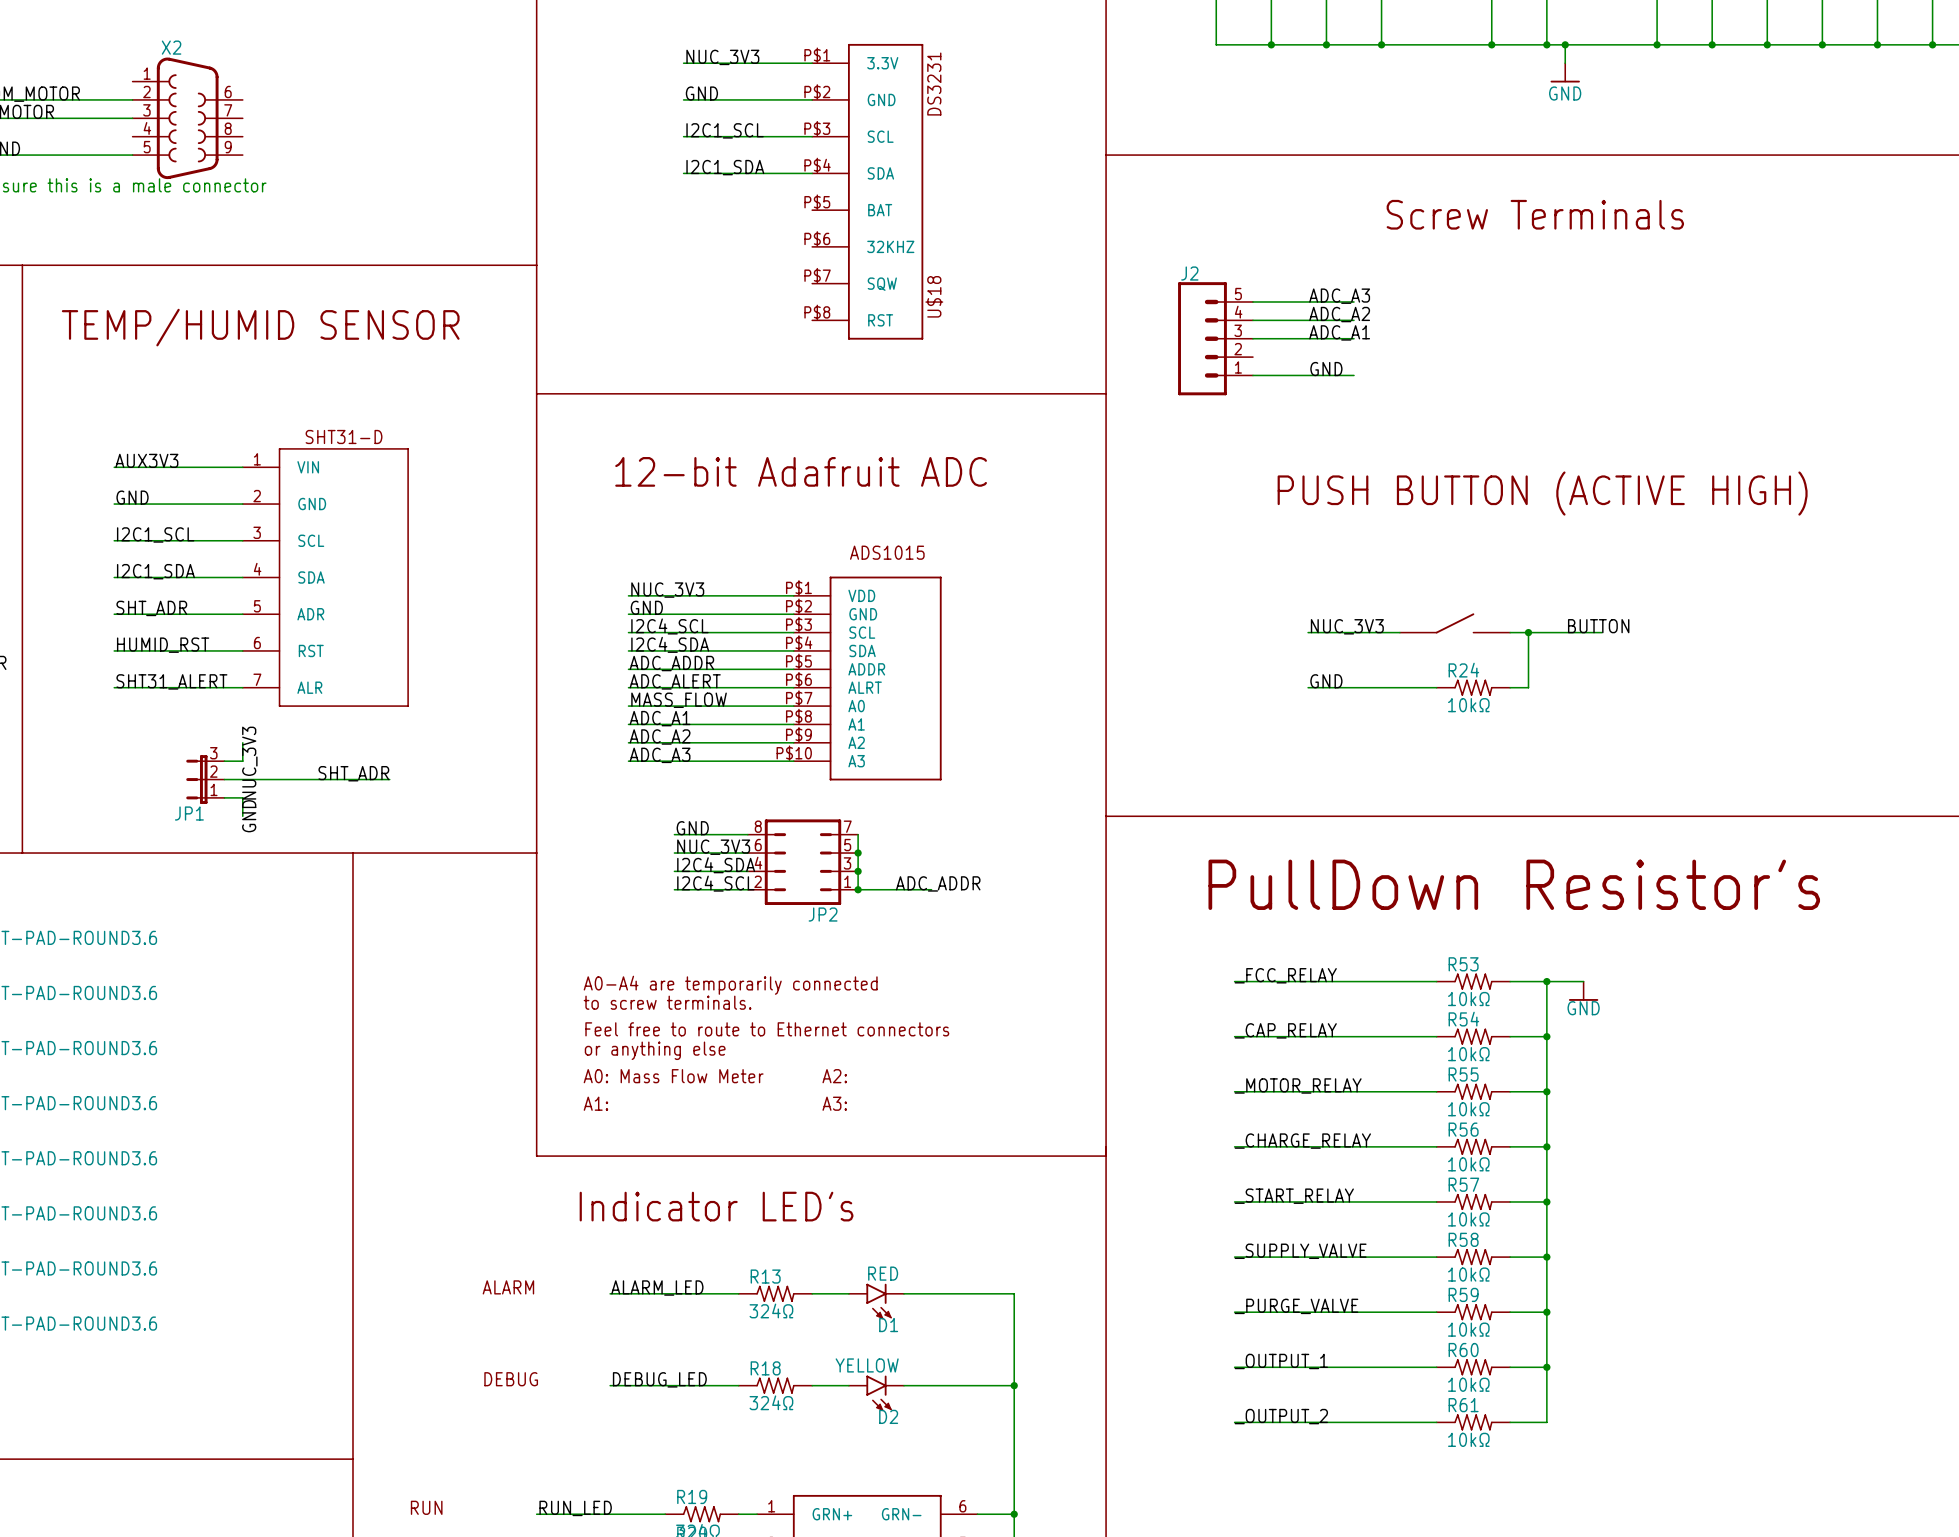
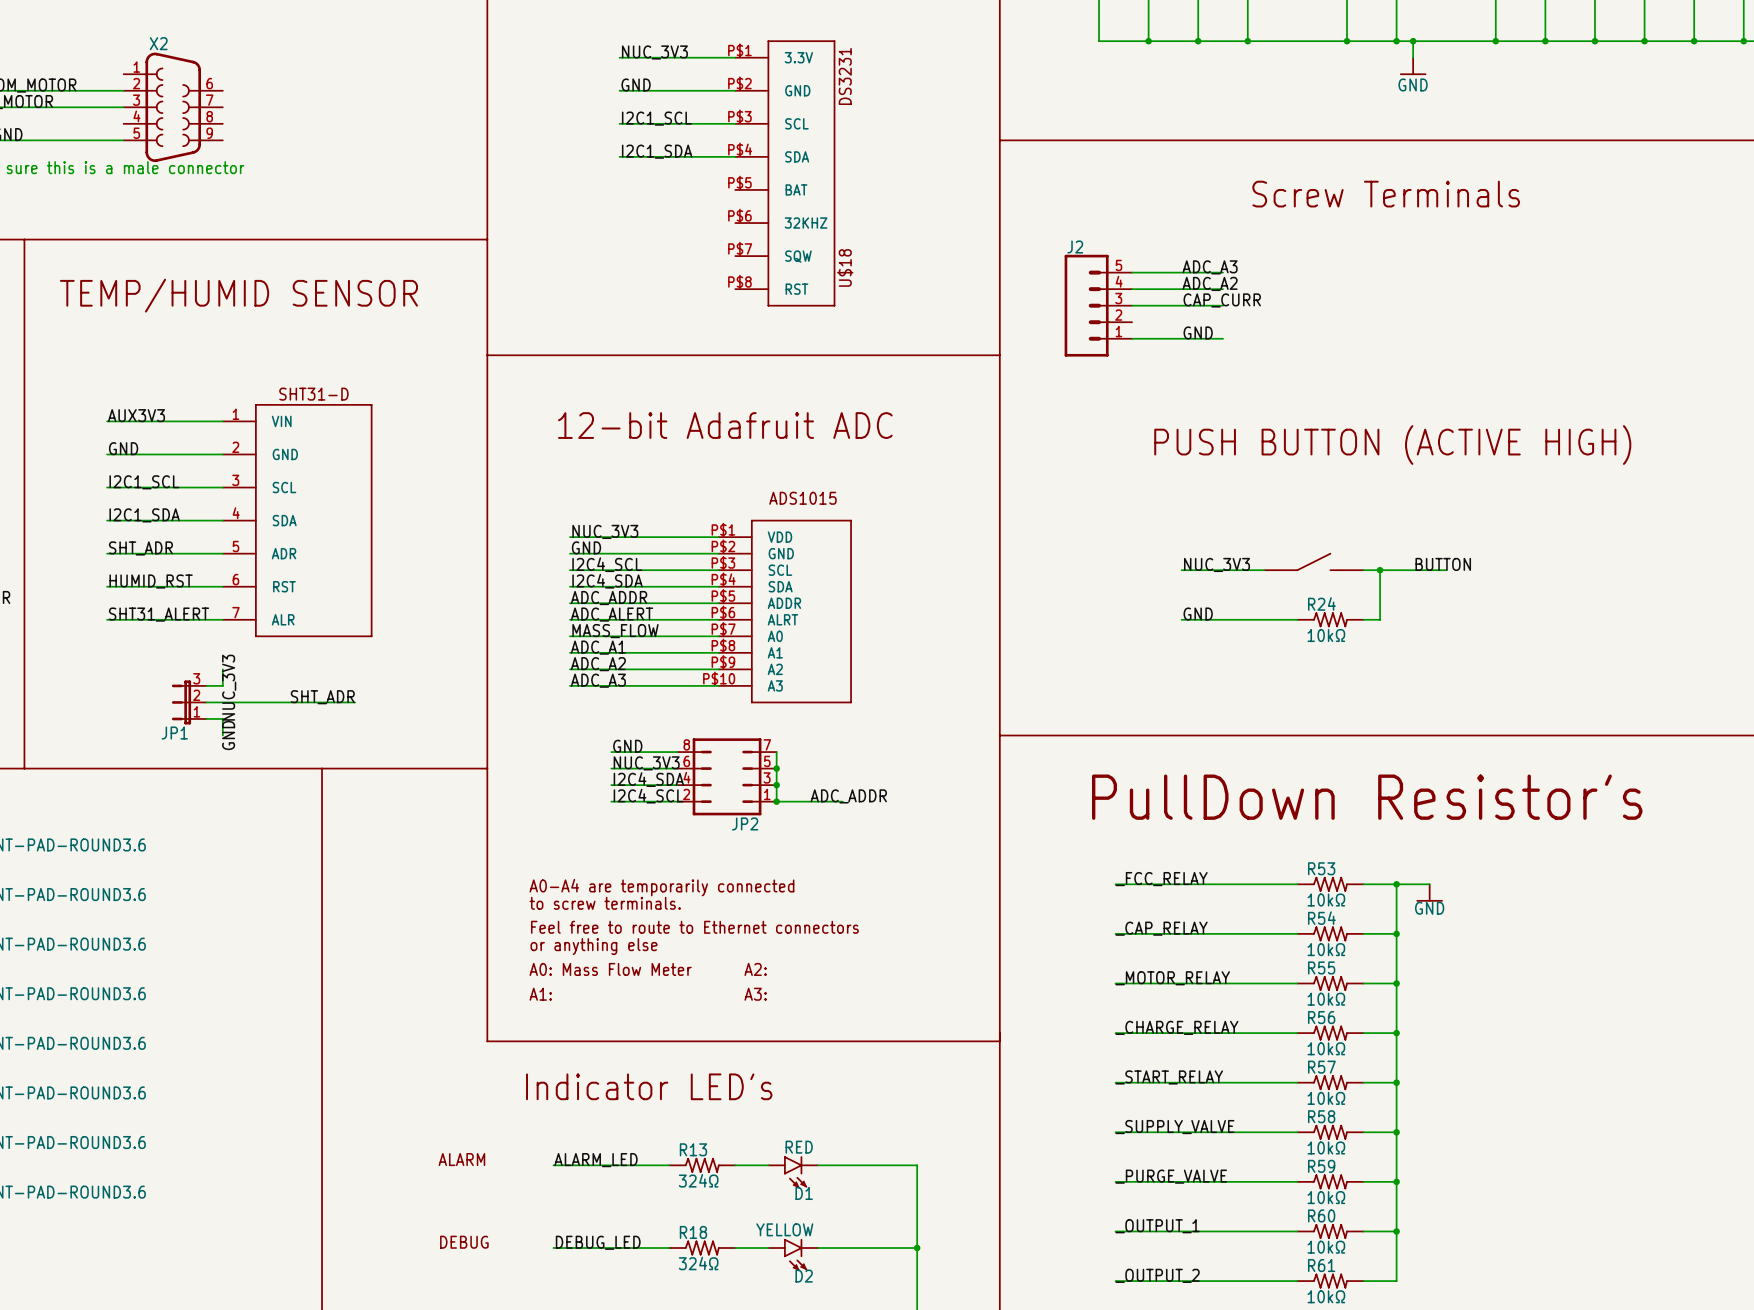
label: ADC_A1 (1339, 332) -> CAP_CURR (1222, 300)

